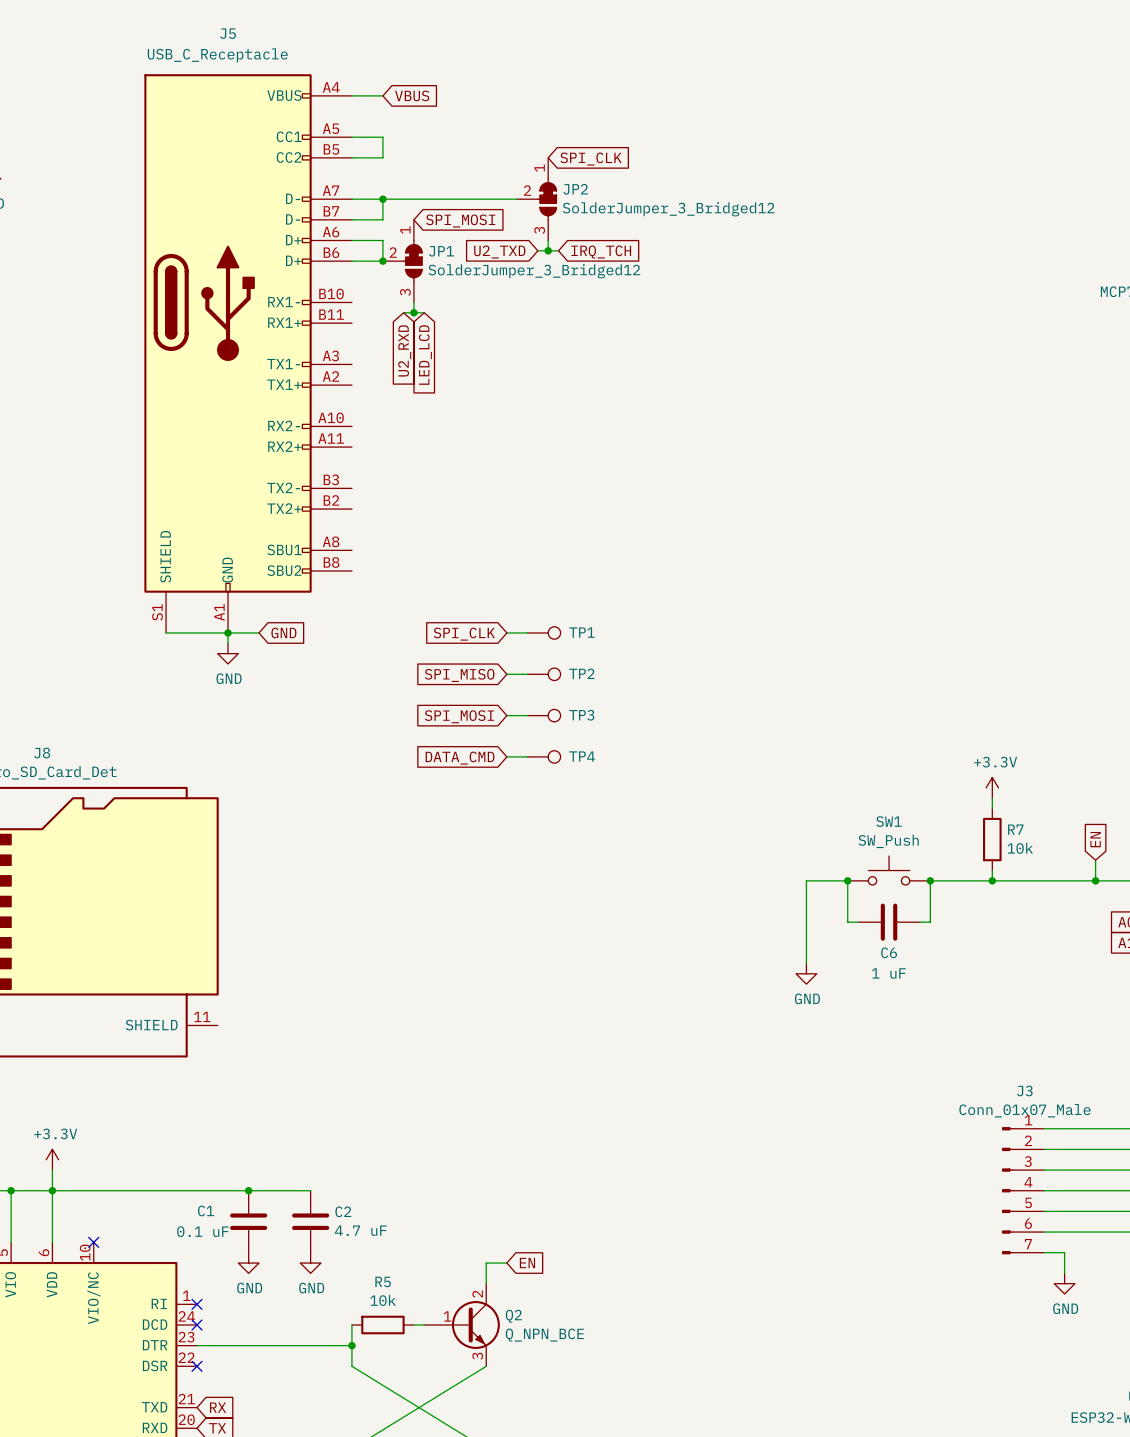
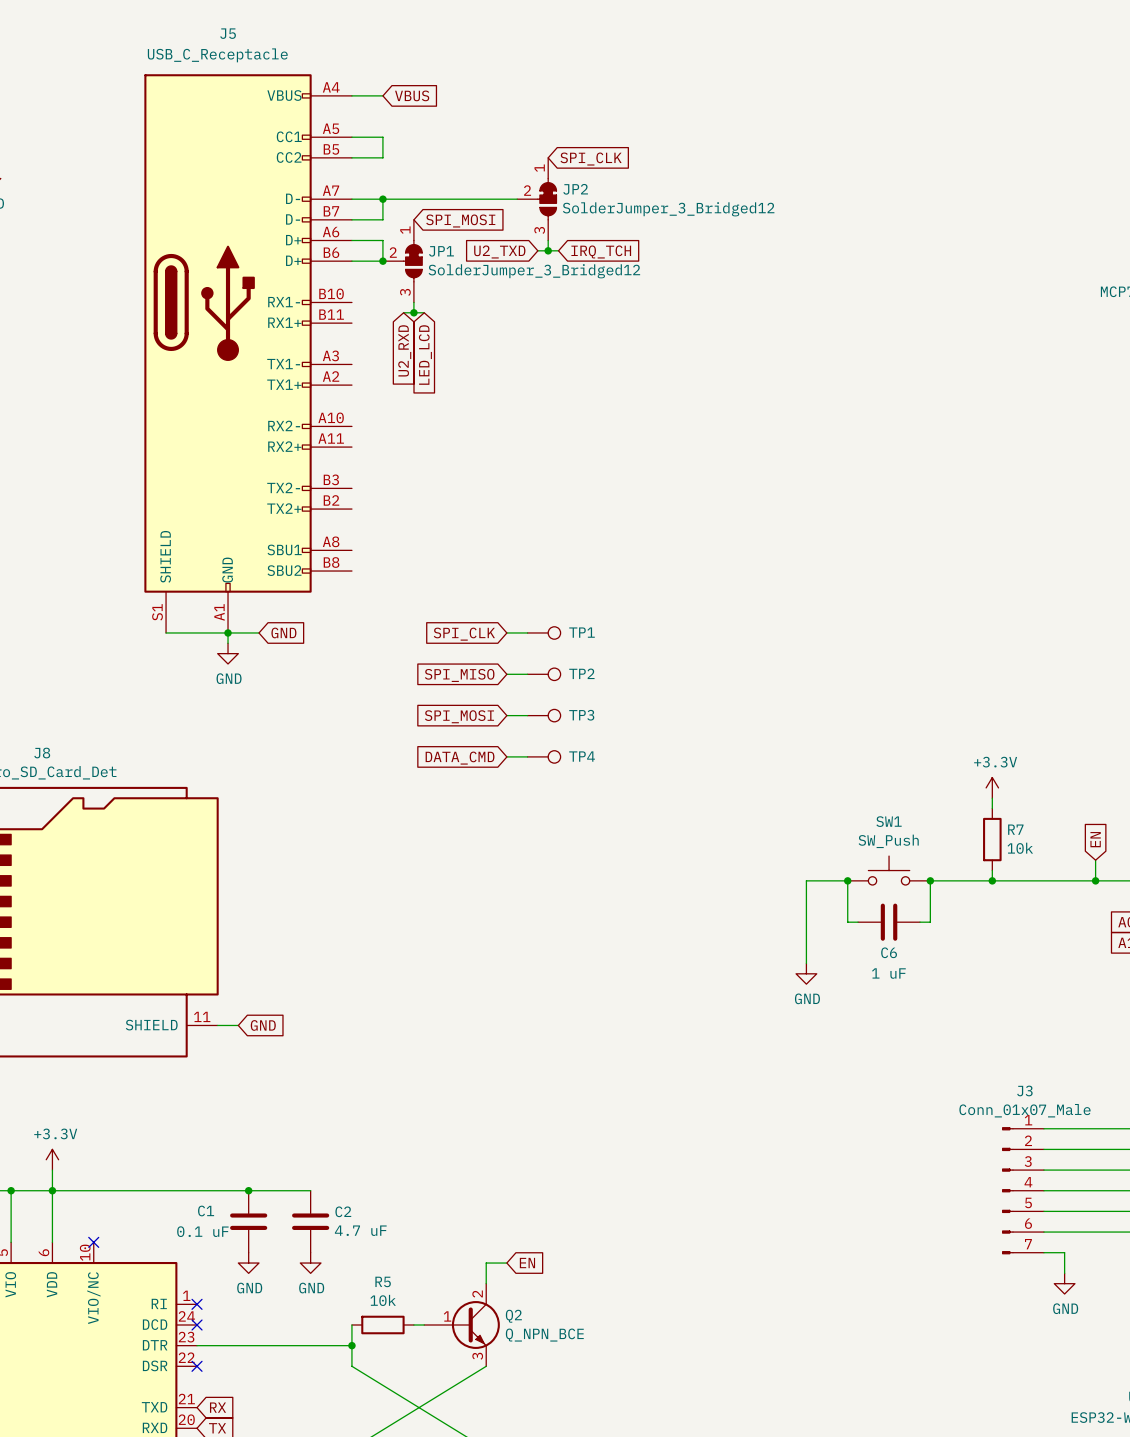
wire: none -> (217, 1025) (238, 1025)
global label: none -> GND (263, 1025)

